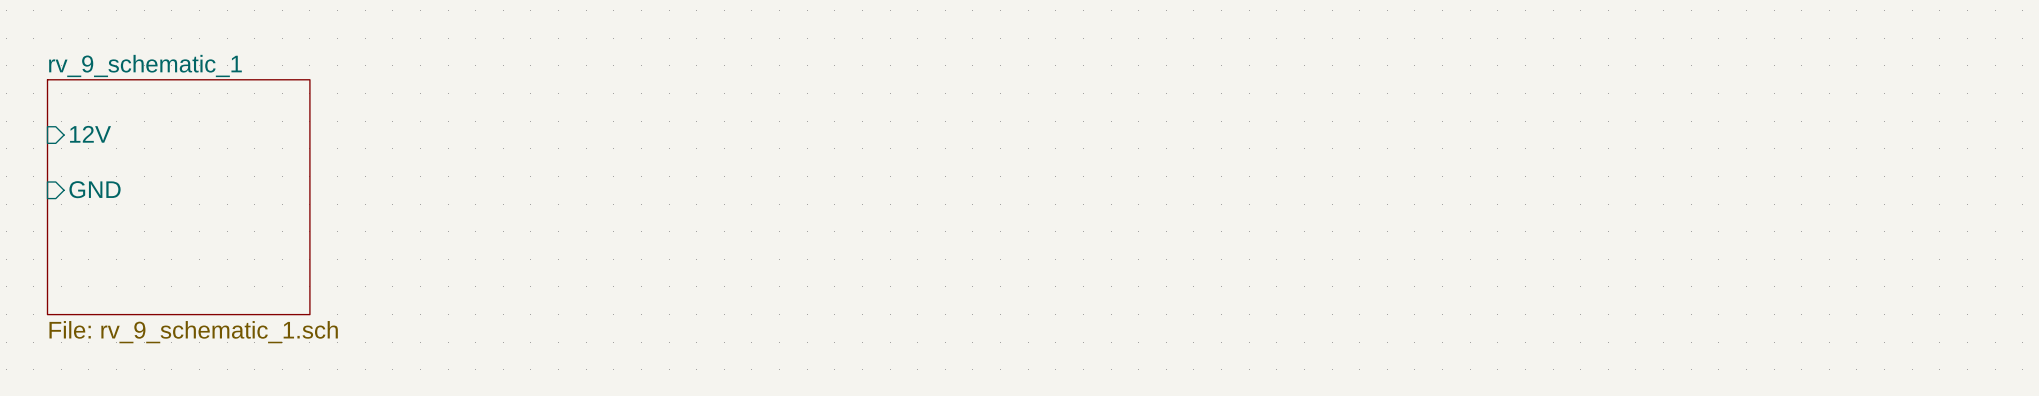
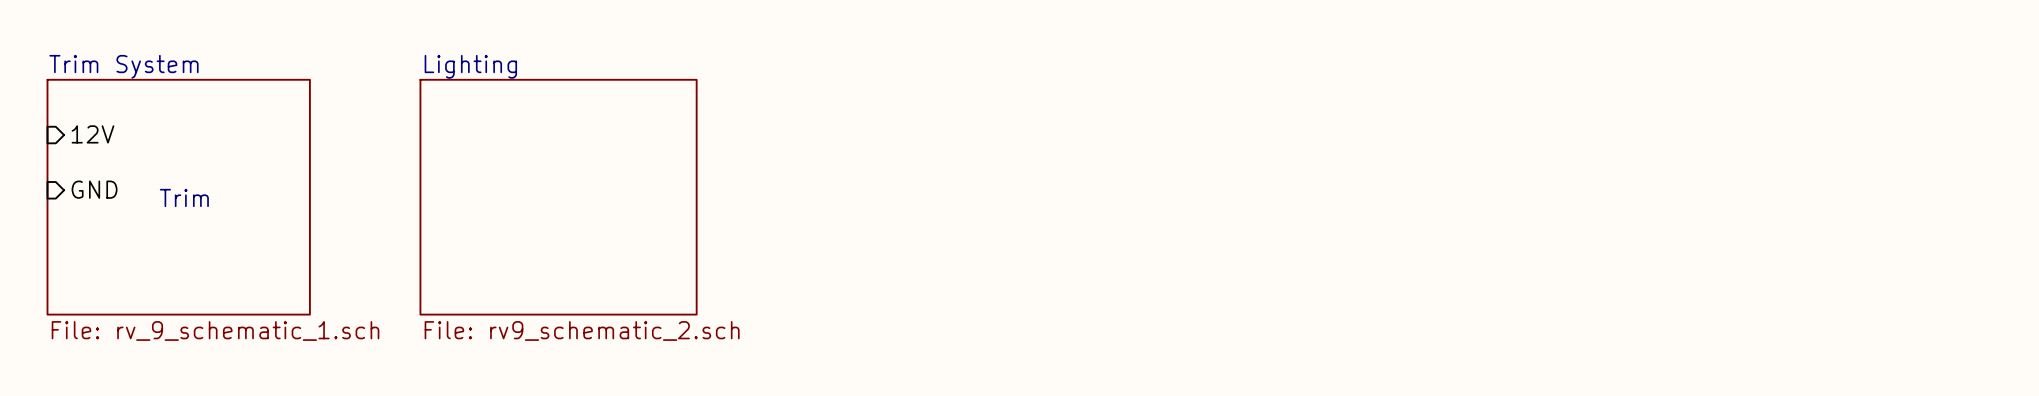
sheet rv_9_schematic_1 name: rv_9_schematic_1 (145, 65) -> Trim System (123, 66)
text: none -> Trim (184, 197)
sheet Lighting: none -> File: rv9_schematic_2.sch (558, 197)

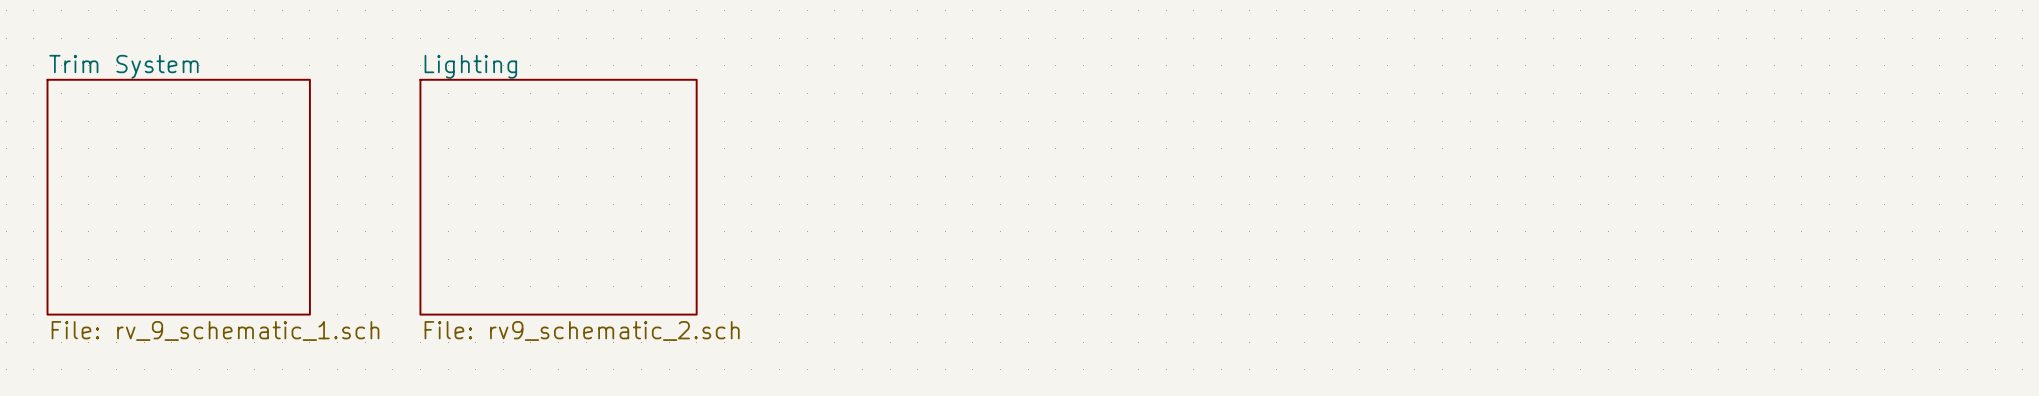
sheet pin: 12V (92, 134) -> none
sheet pin: GND (94, 189) -> none
text: Trim (184, 197) -> none

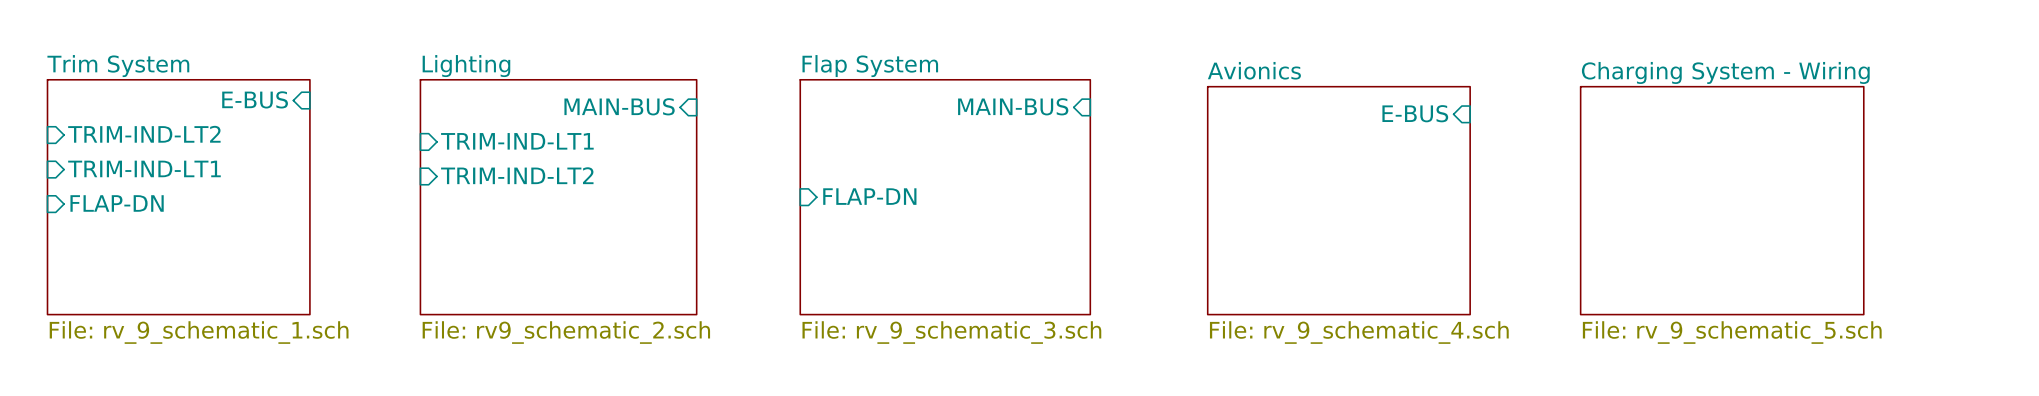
sheet pin: none -> E-BUS (255, 99)
sheet pin: none -> MAIN-BUS (619, 106)
sheet pin: none -> MAIN-BUS (1013, 106)
sheet pin: none -> E-BUS (1415, 113)
sheet pin: none -> TRIM-IND-LT2 (144, 134)
sheet pin: none -> TRIM-IND-LT1 (517, 141)
sheet pin: none -> TRIM-IND-LT1 (144, 168)
sheet pin: none -> TRIM-IND-LT2 (517, 175)
sheet pin: none -> FLAP-DN (869, 196)
sheet Flap System: none -> File: rv_9_schematic_3.sch (945, 197)
sheet Avionics: none -> File: rv_9_schematic_4.sch (1338, 200)
sheet Charging System - Wiring: none -> File: rv_9_schematic_5.sch (1722, 200)
sheet pin: none -> FLAP-DN (117, 203)

